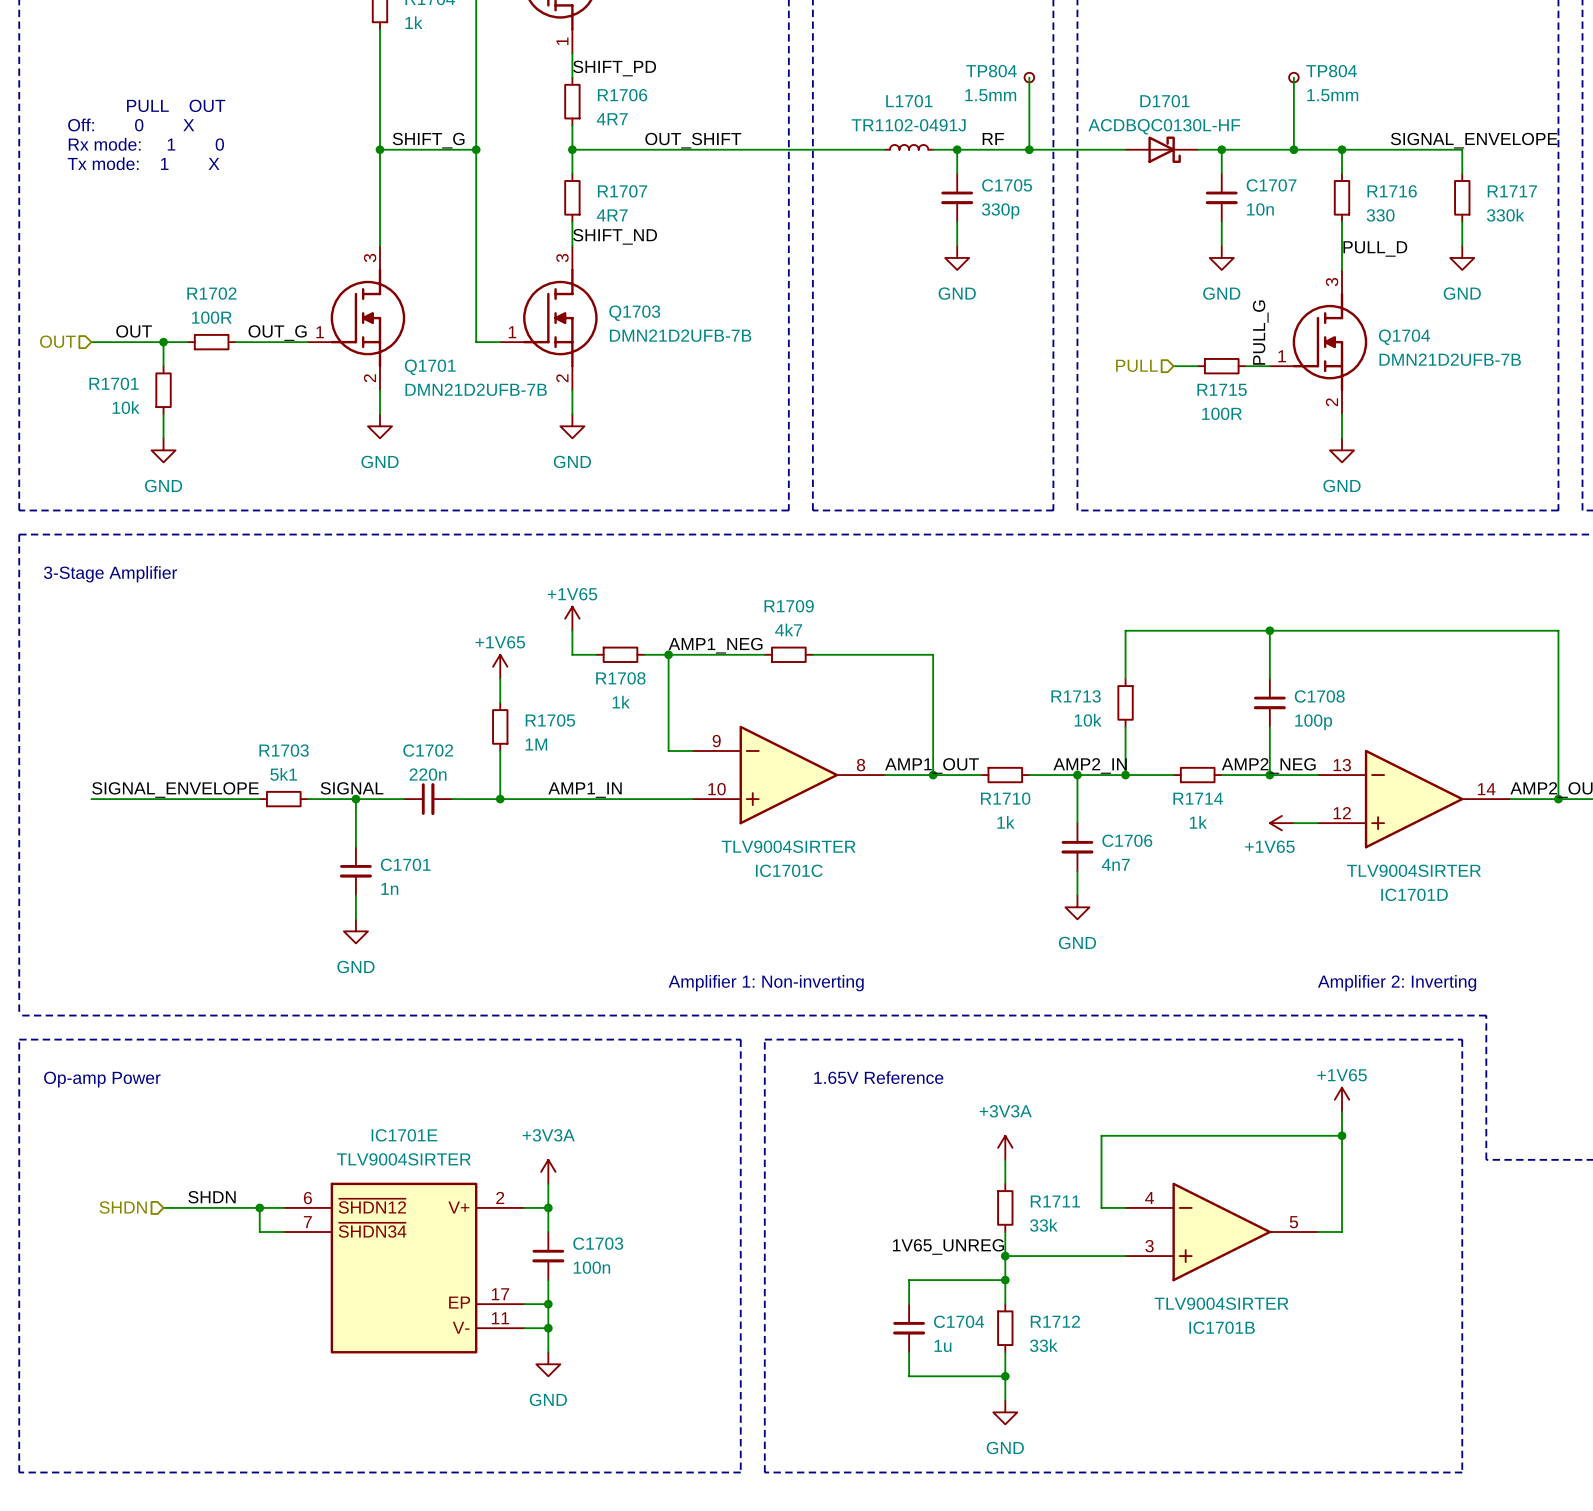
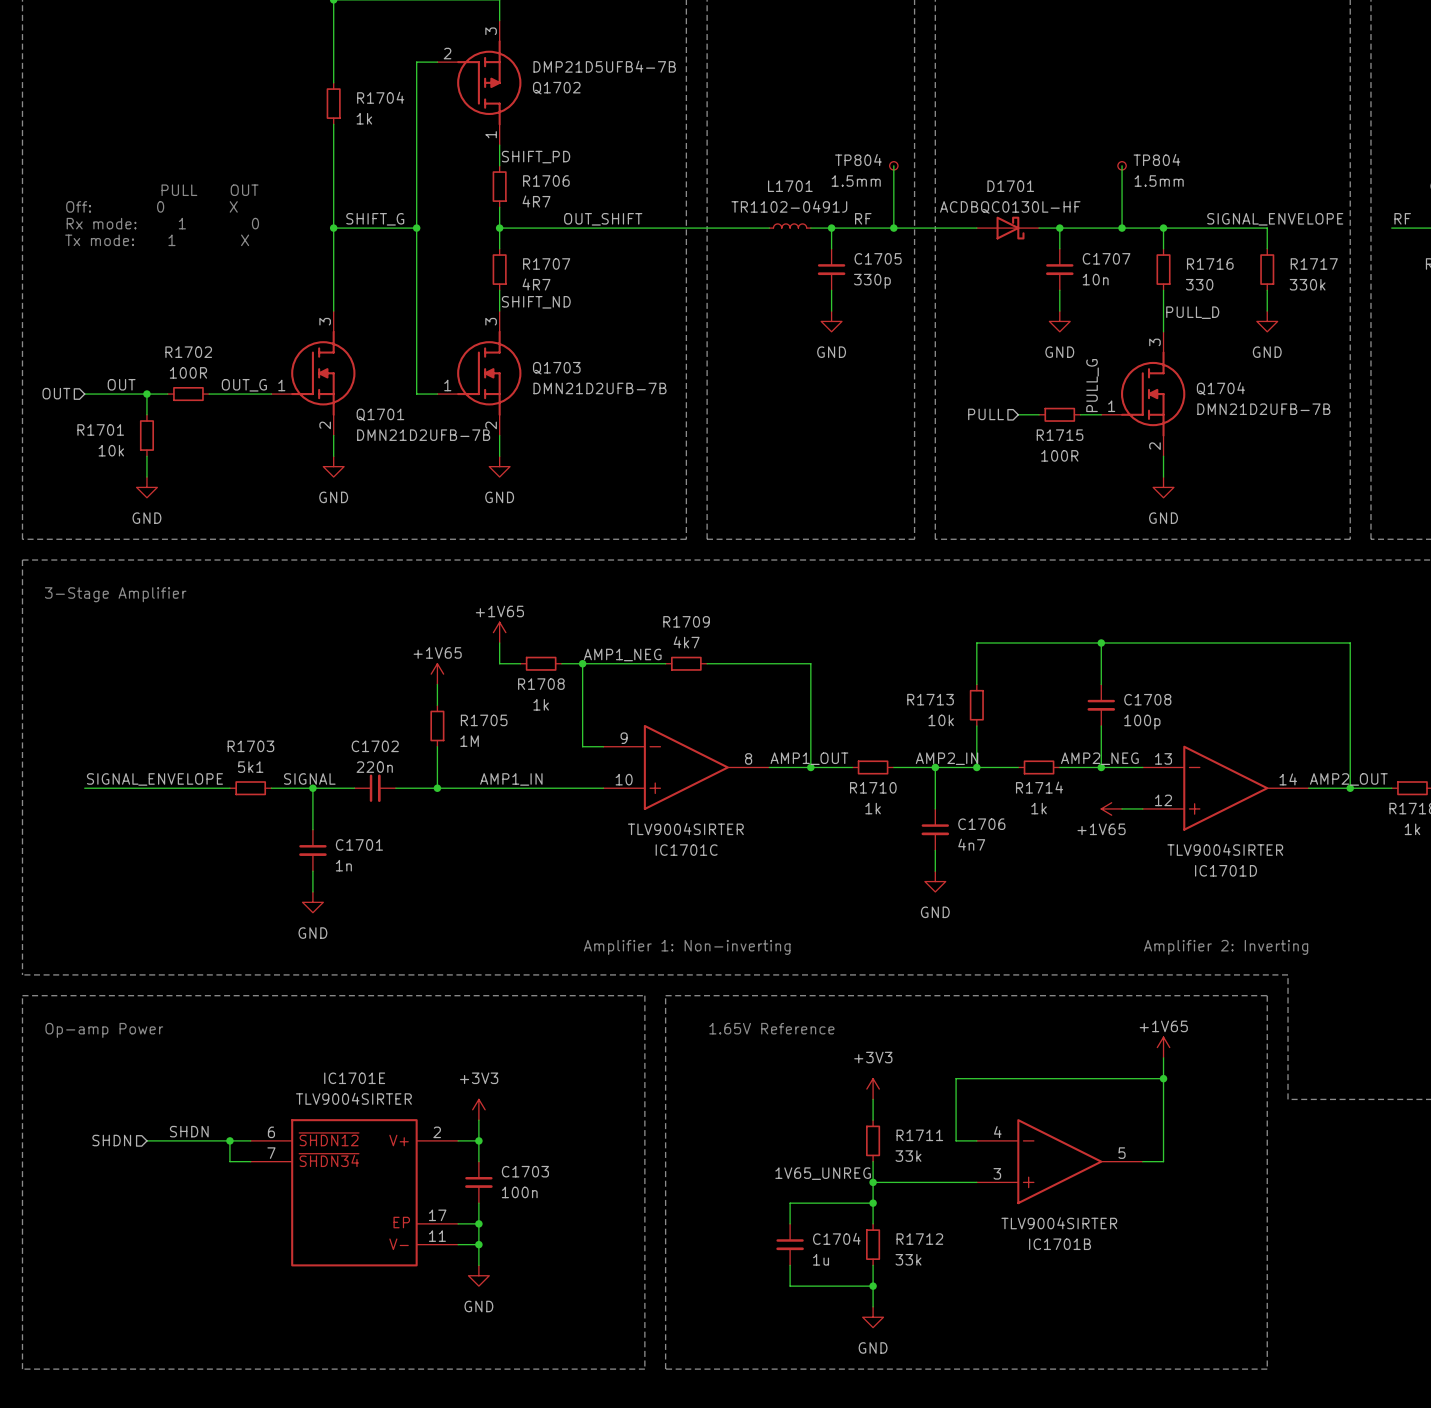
power symbol: +3V3A (1005, 1147) -> +3V3 (873, 1089)
power symbol: +3V3A (548, 1171) -> +3V3 (478, 1109)

